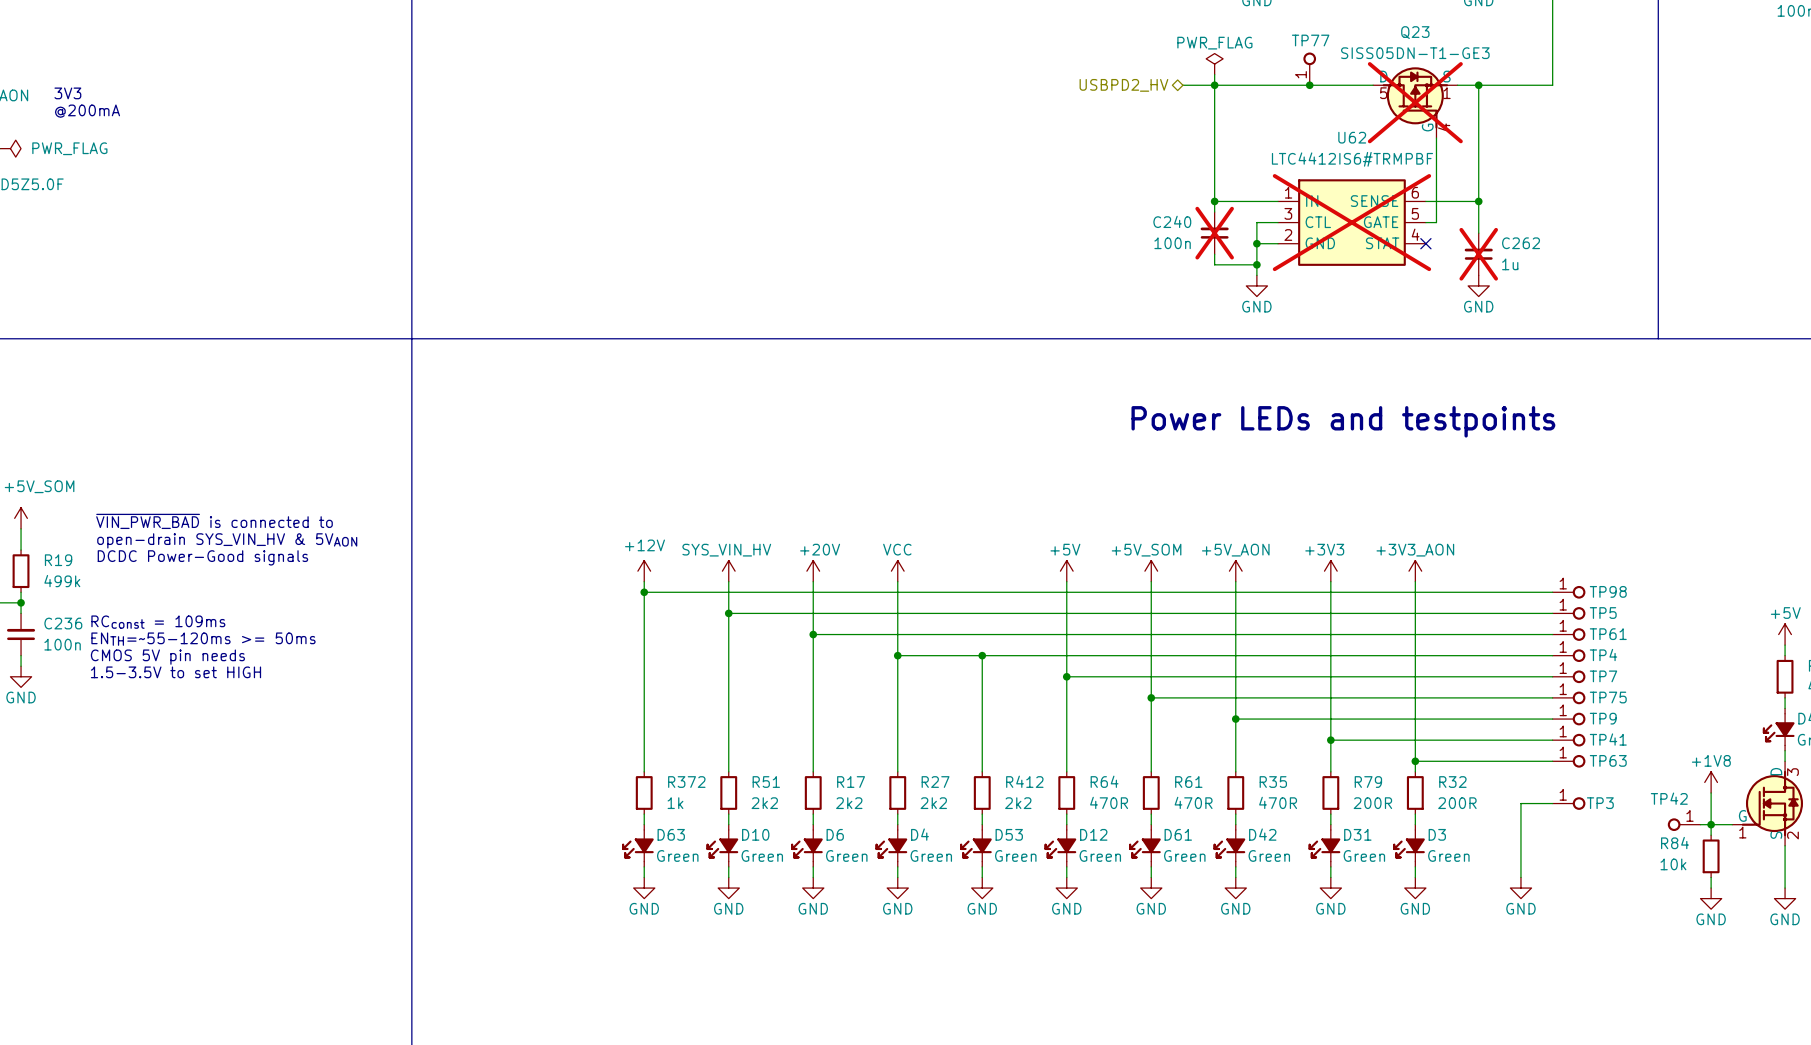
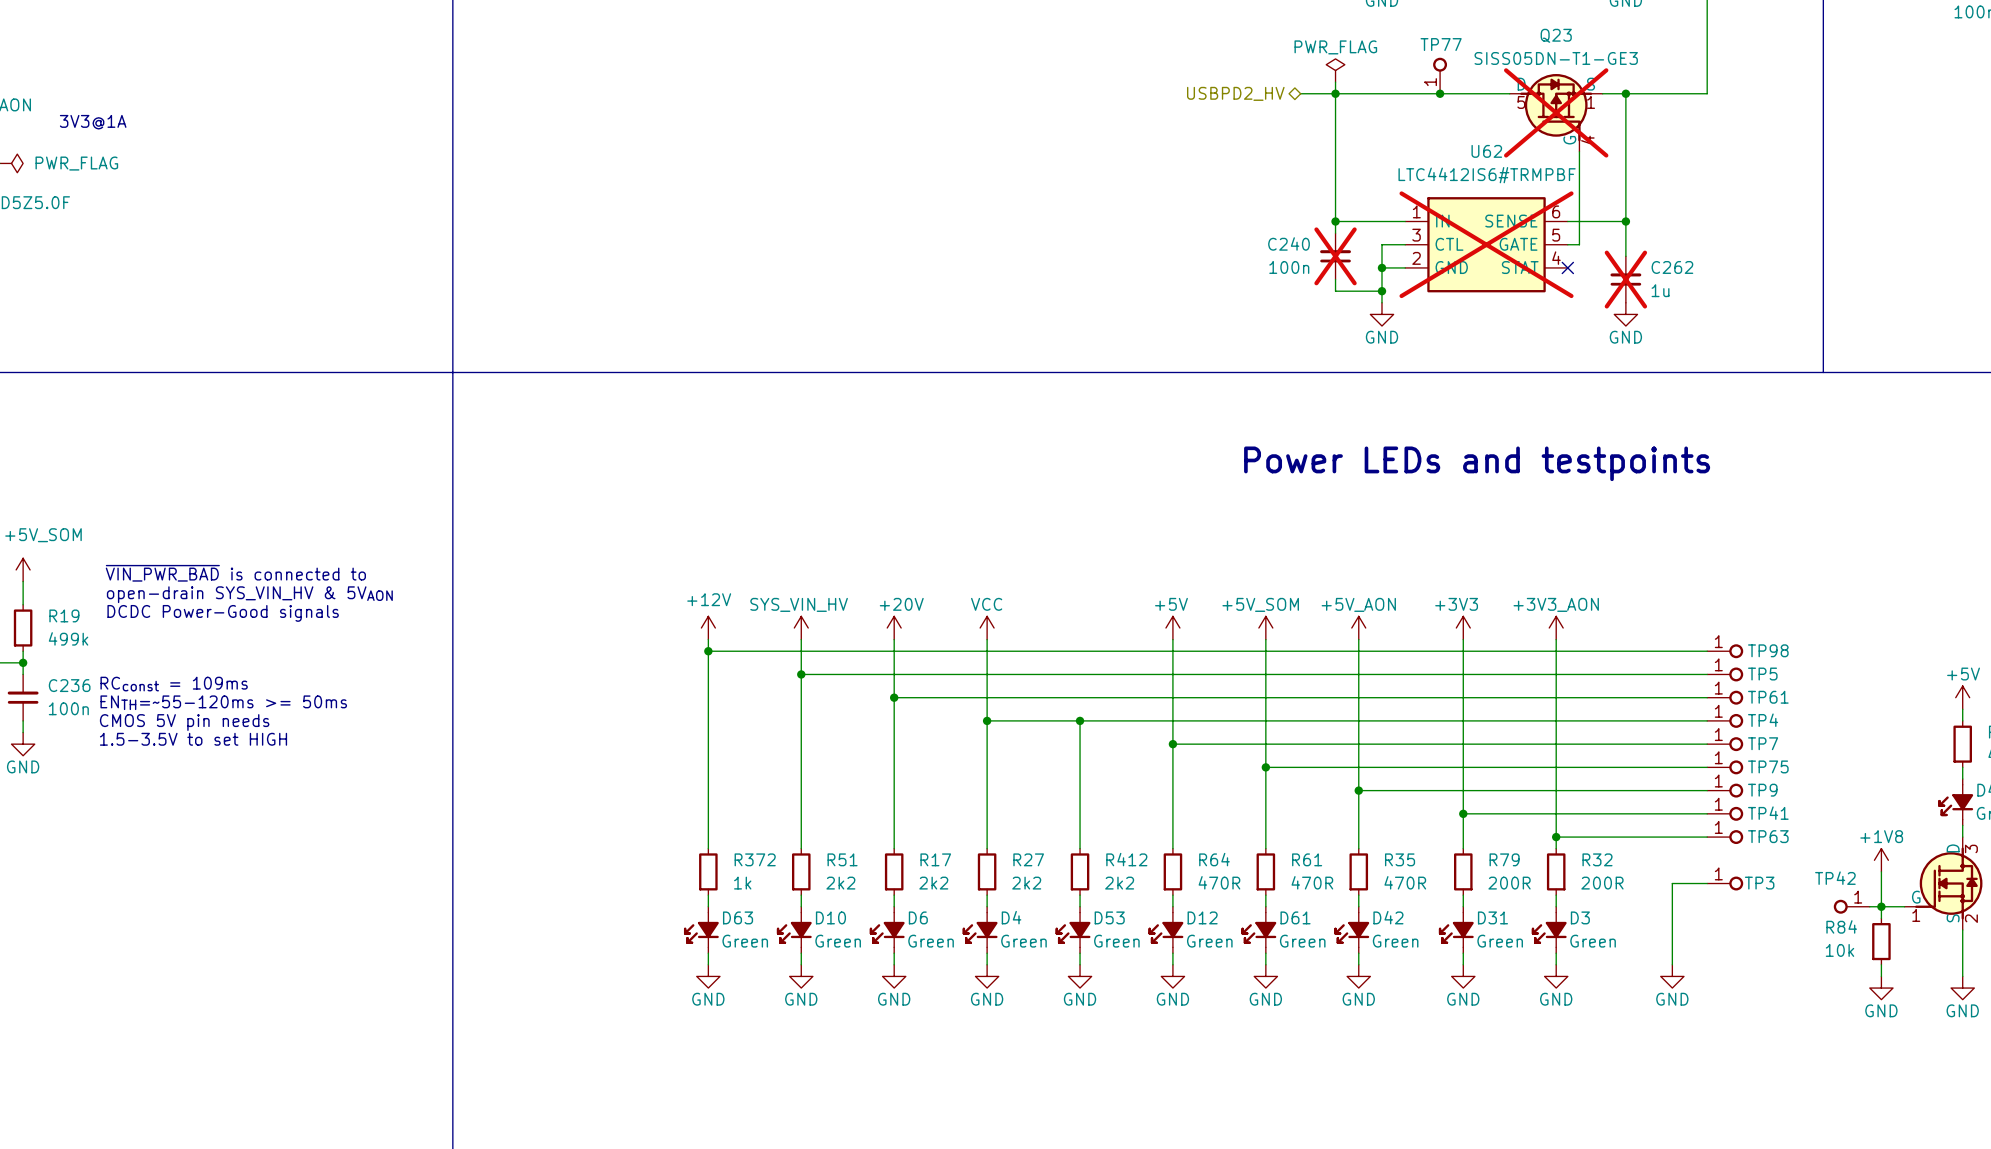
text: 3V3 (67, 93) -> none
text: @200mA (87, 111) -> 3V3@1A (93, 122)

